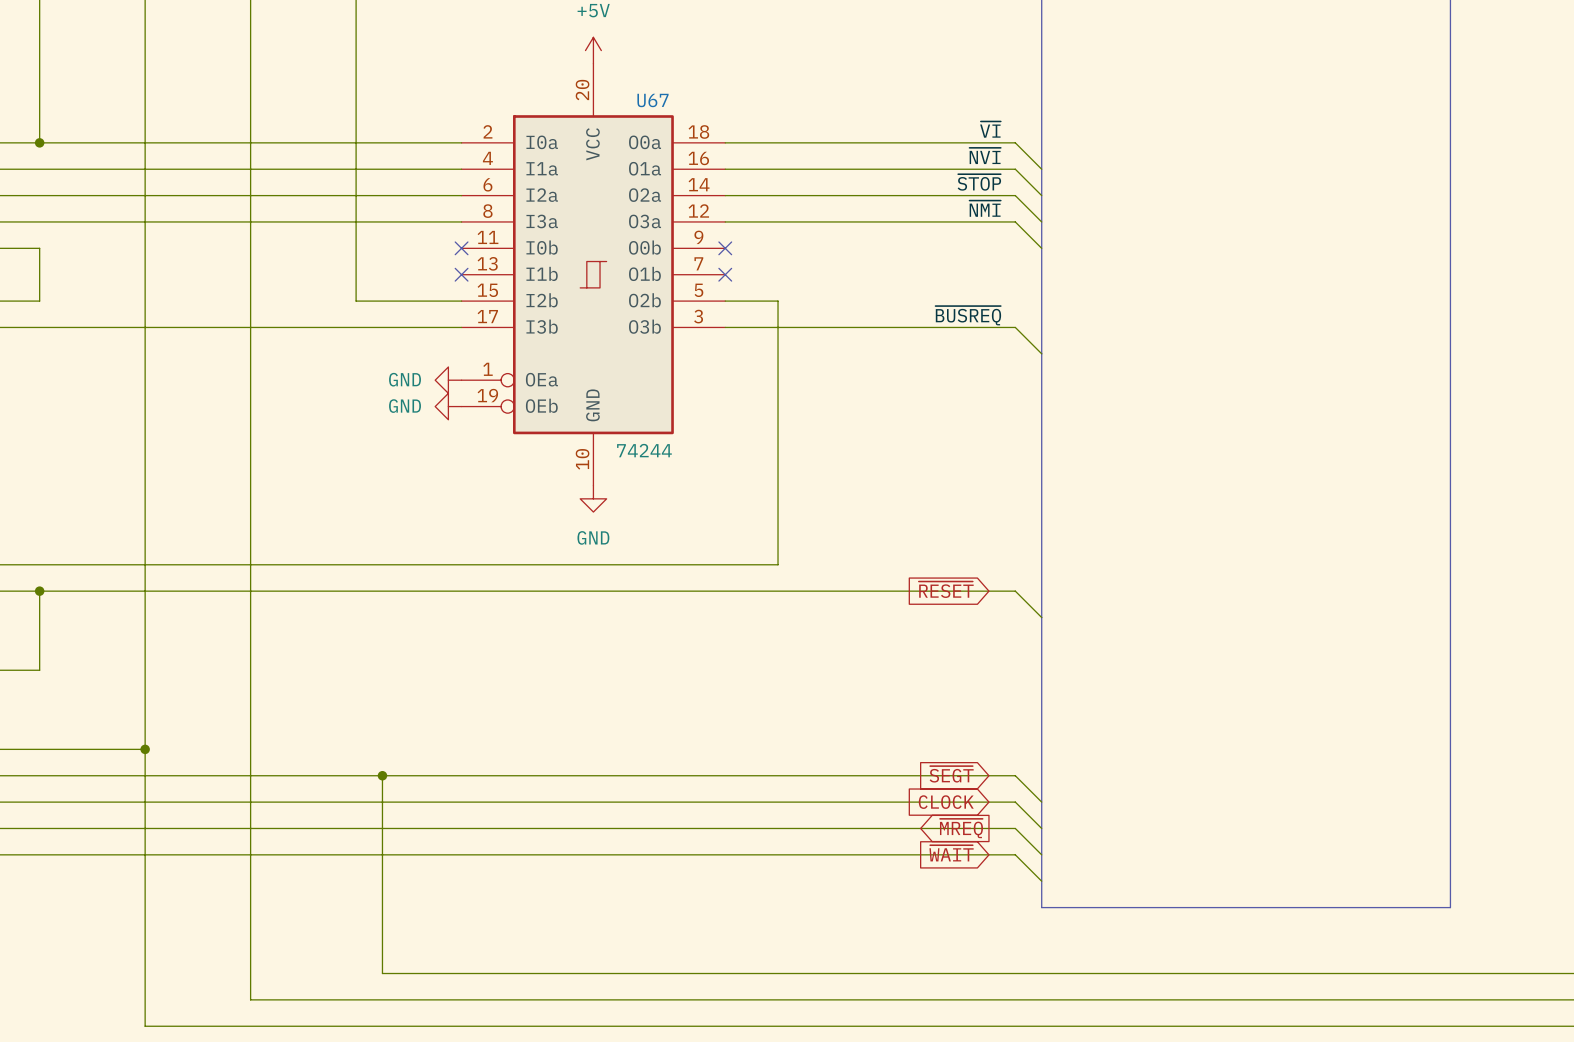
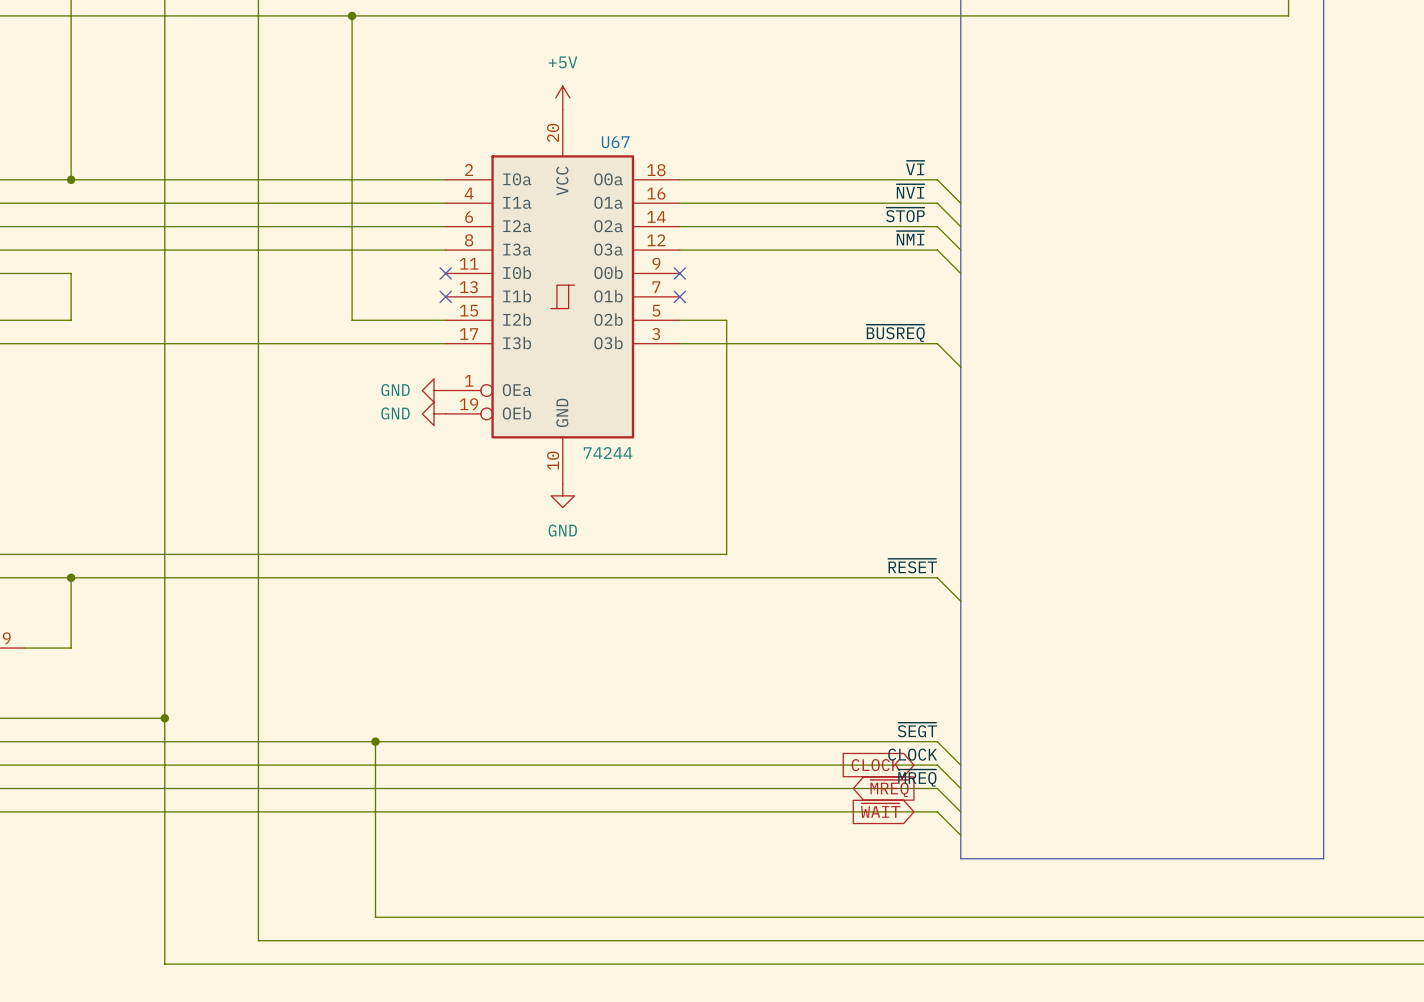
label: none -> ~{RESET} (912, 566)
global label: ~{RESET} (946, 589) -> none
label: none -> ~{SEGT} (917, 729)
global label: ~{SEGT} (951, 774) -> none
label: none -> CLOCK (912, 754)
label: none -> ~{MREQ} (917, 778)

